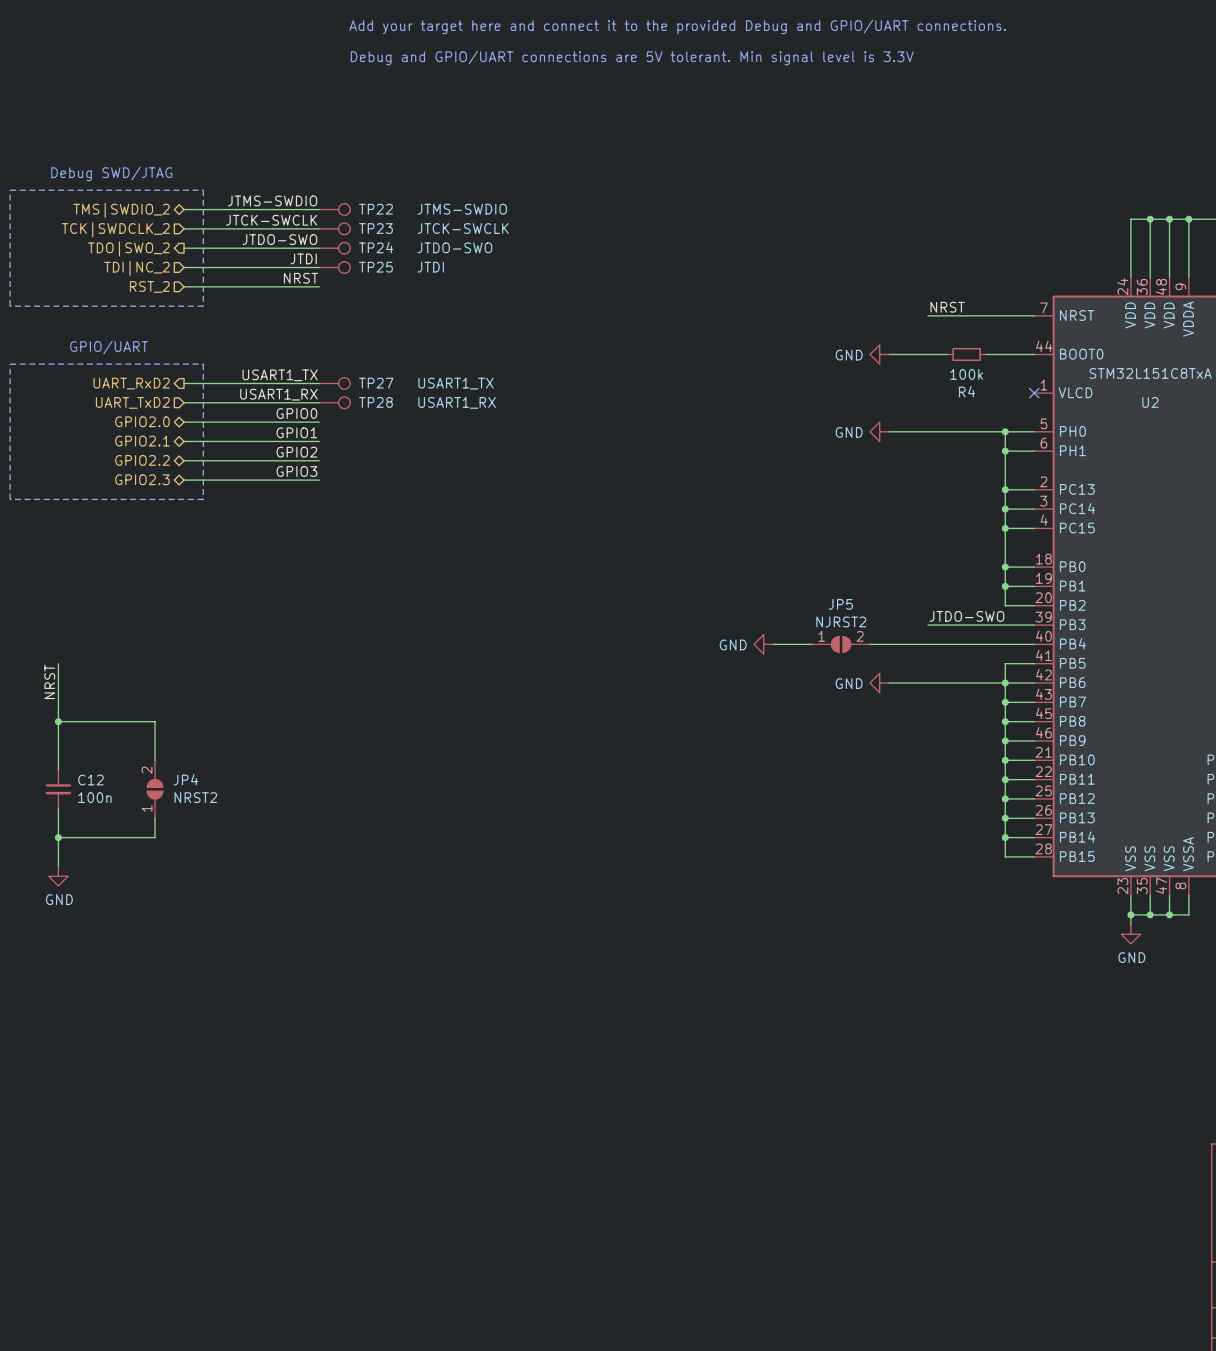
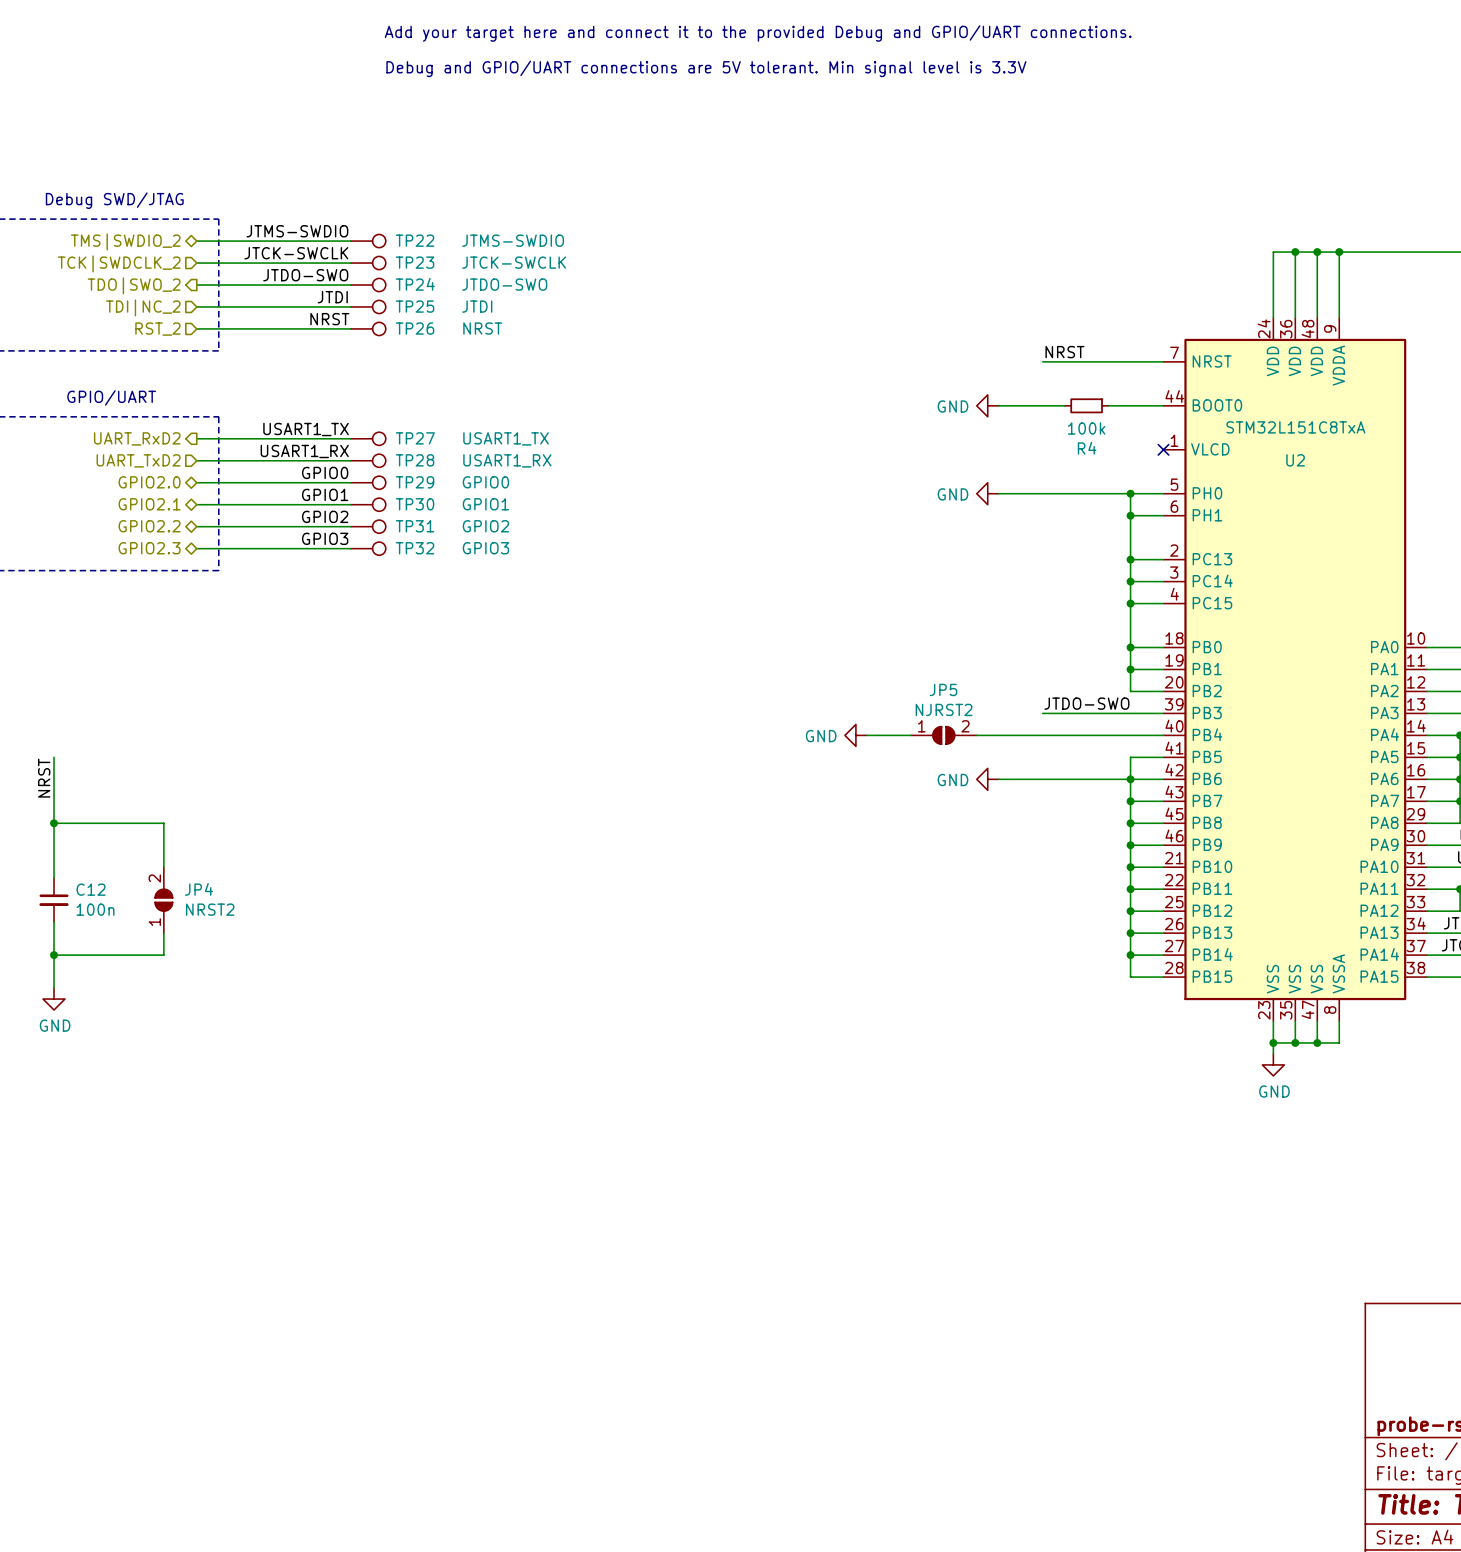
TP26: none -> NRST (368, 328)
TP29: none -> GPIO0 (368, 482)
TP30: none -> GPIO1 (368, 504)
TP31: none -> GPIO2 (368, 526)
TP32: none -> GPIO3 (368, 548)

